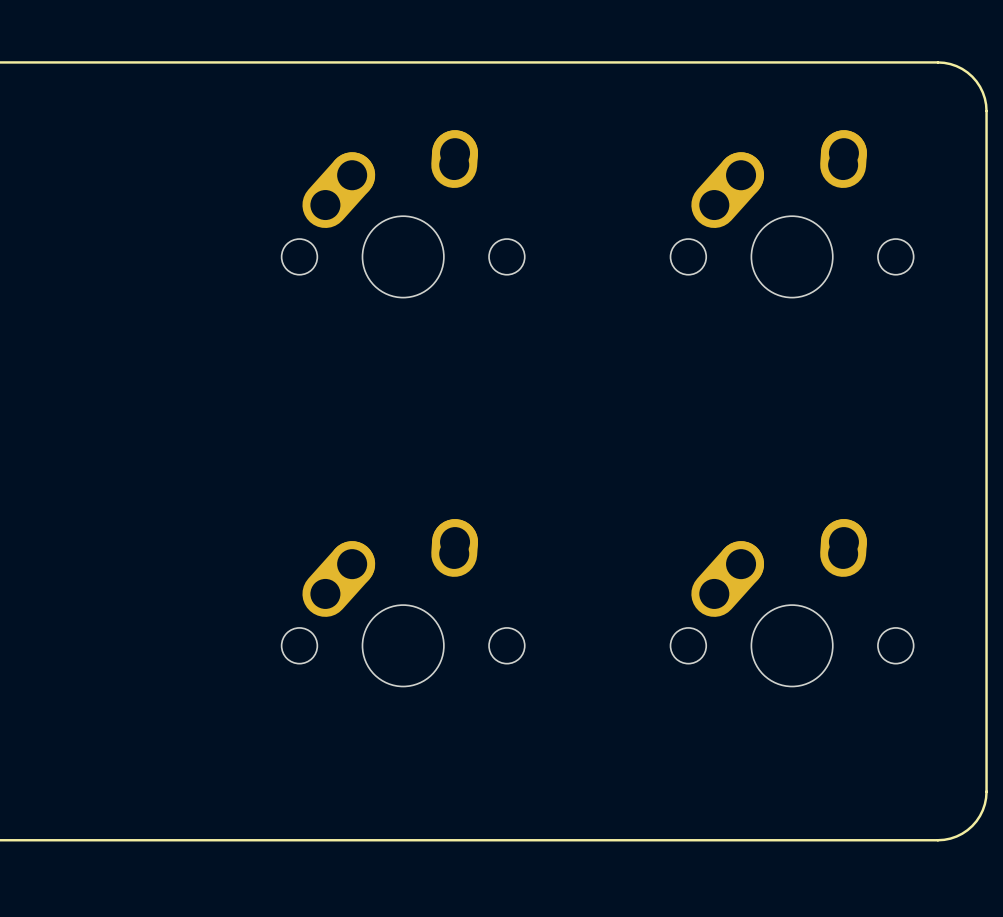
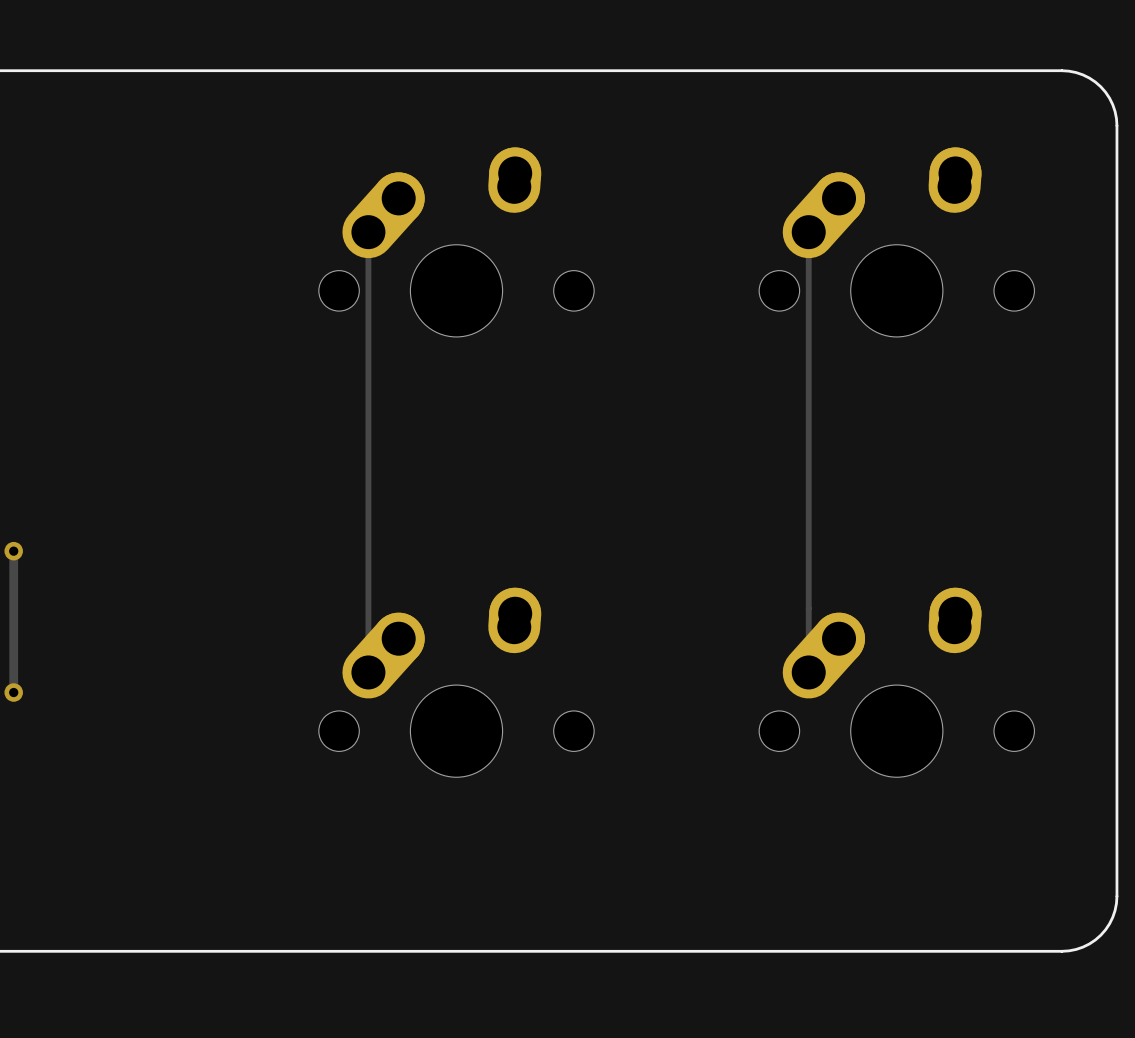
track: none -> (368, 232) (368, 672)
track: none -> (808, 232) (808, 672)
track: none -> (13, 551) (13, 692)
via: none -> (13, 551)
via: none -> (13, 692)

